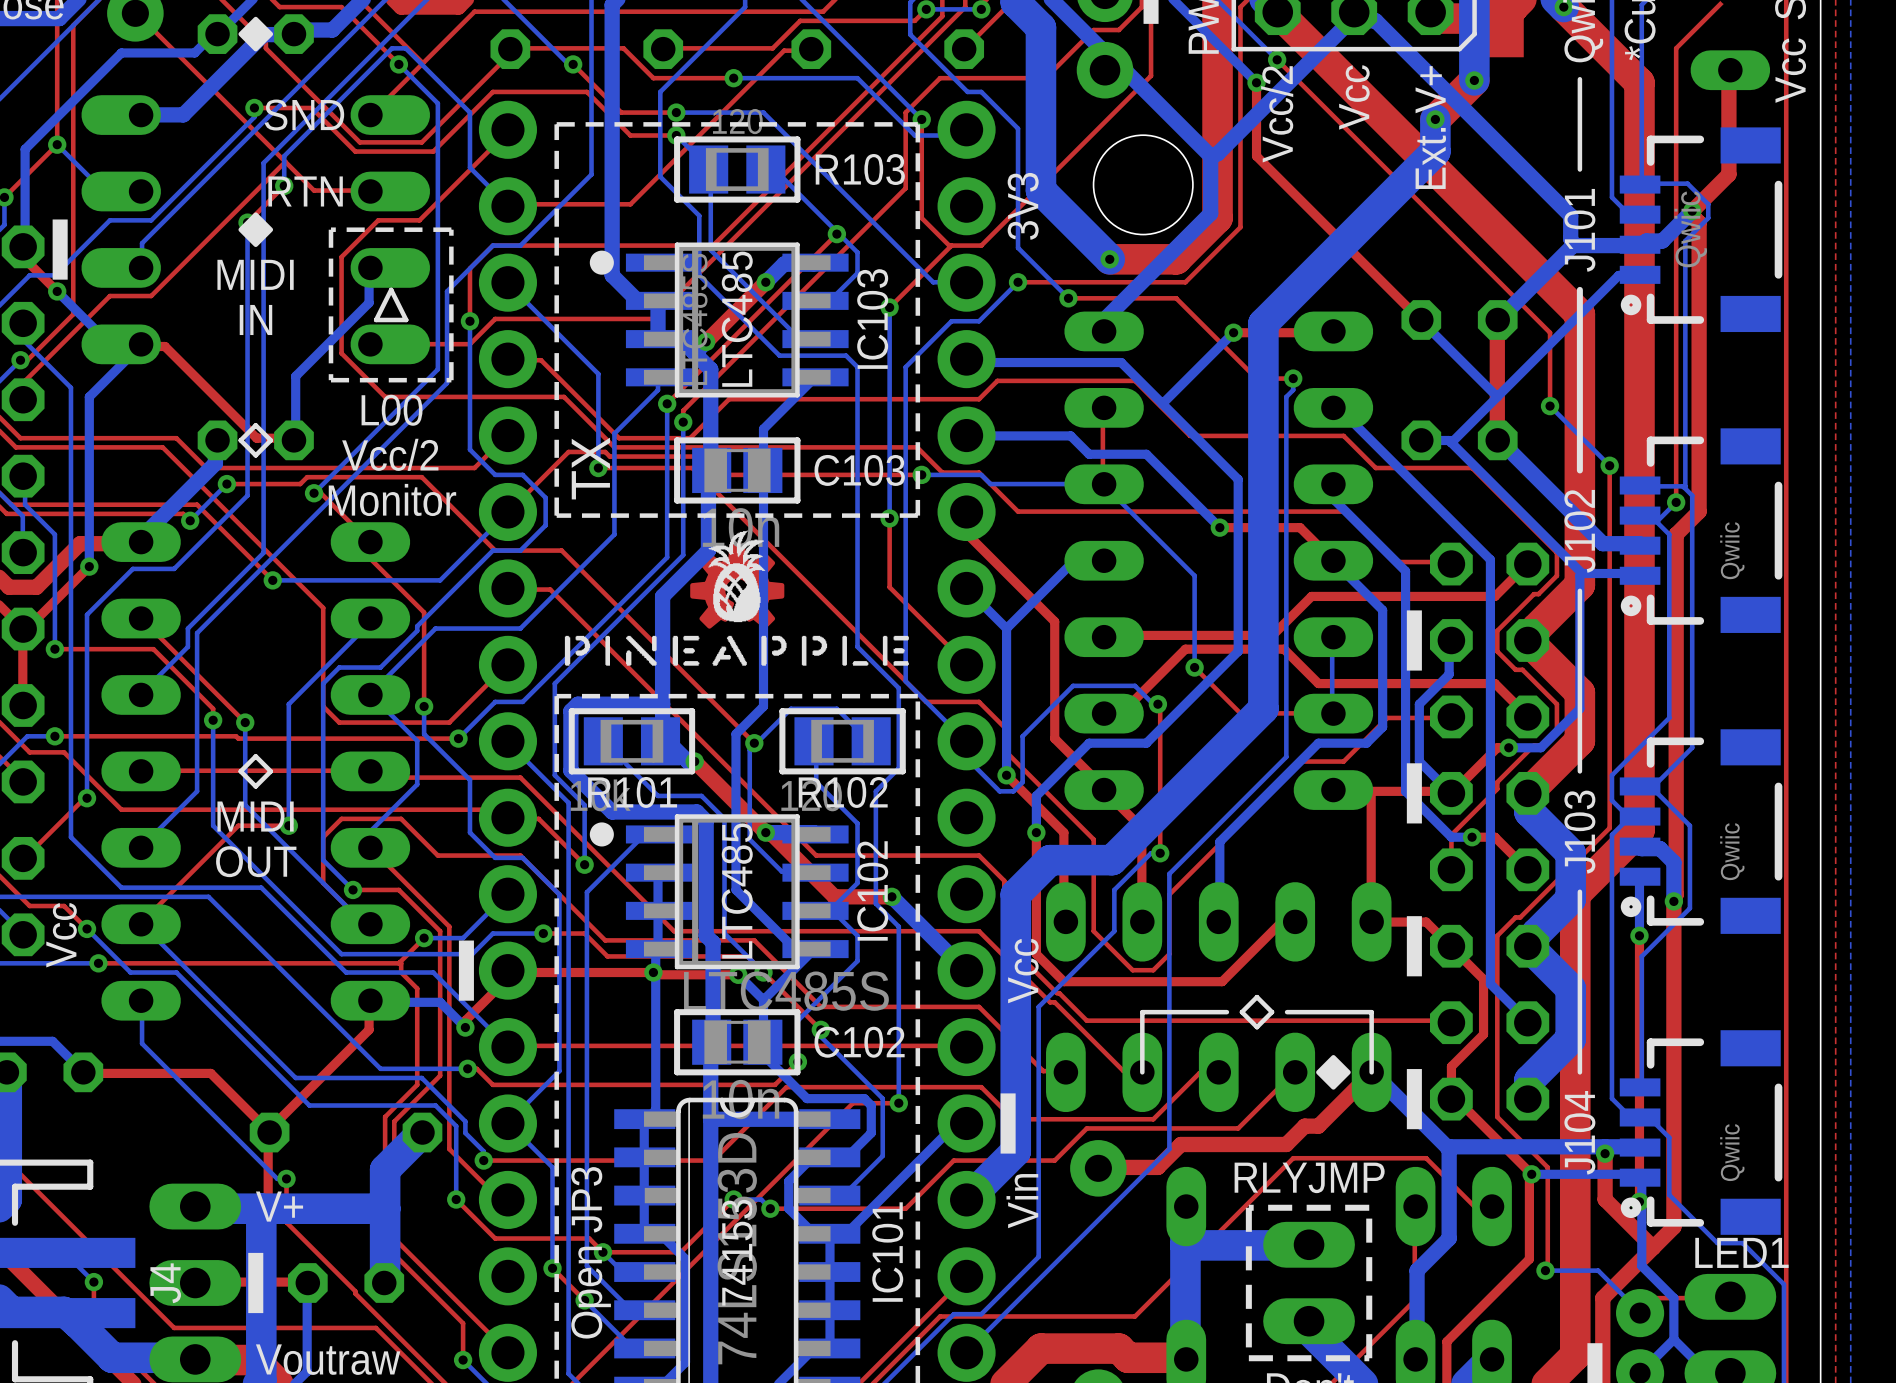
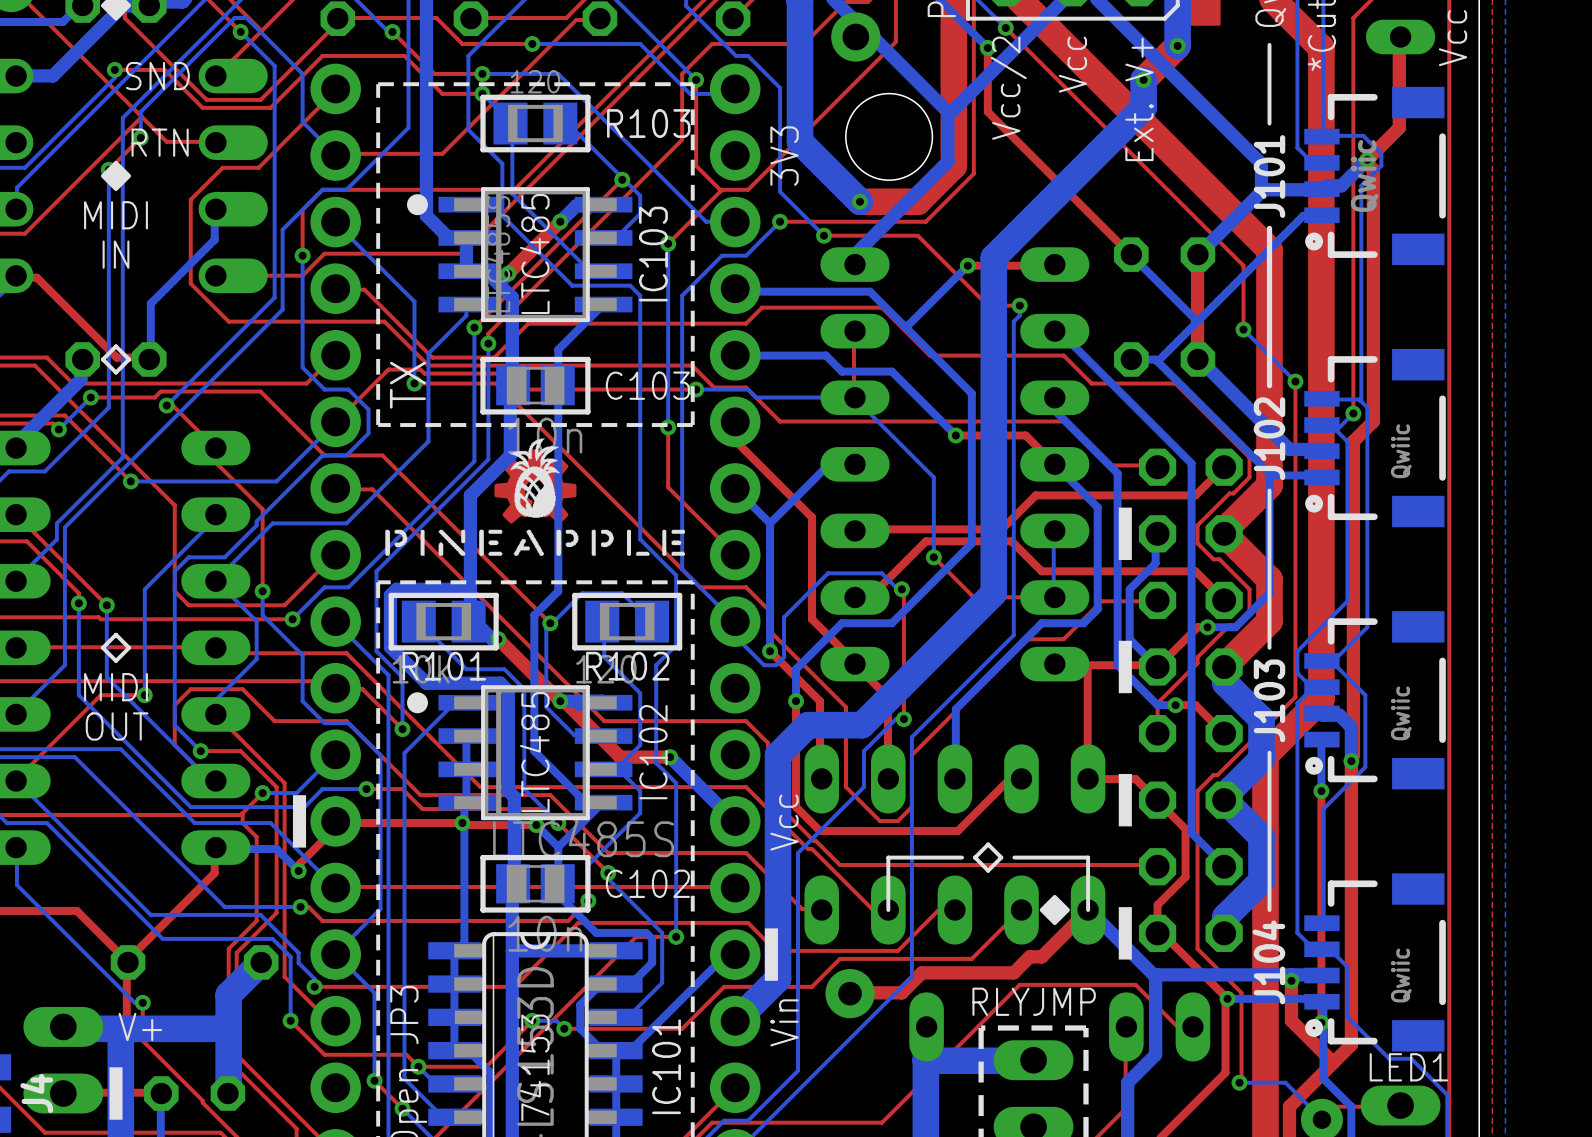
line: (451, 229) (331, 229) (331, 380) (451, 380) (451, 229) -> none
line: (391, 289) (406, 319) (376, 319) (391, 289) -> none
text: L00 (392, 410) -> none
text: Vcc/2 (390, 454) -> none
text: Monitor (392, 499) -> none

